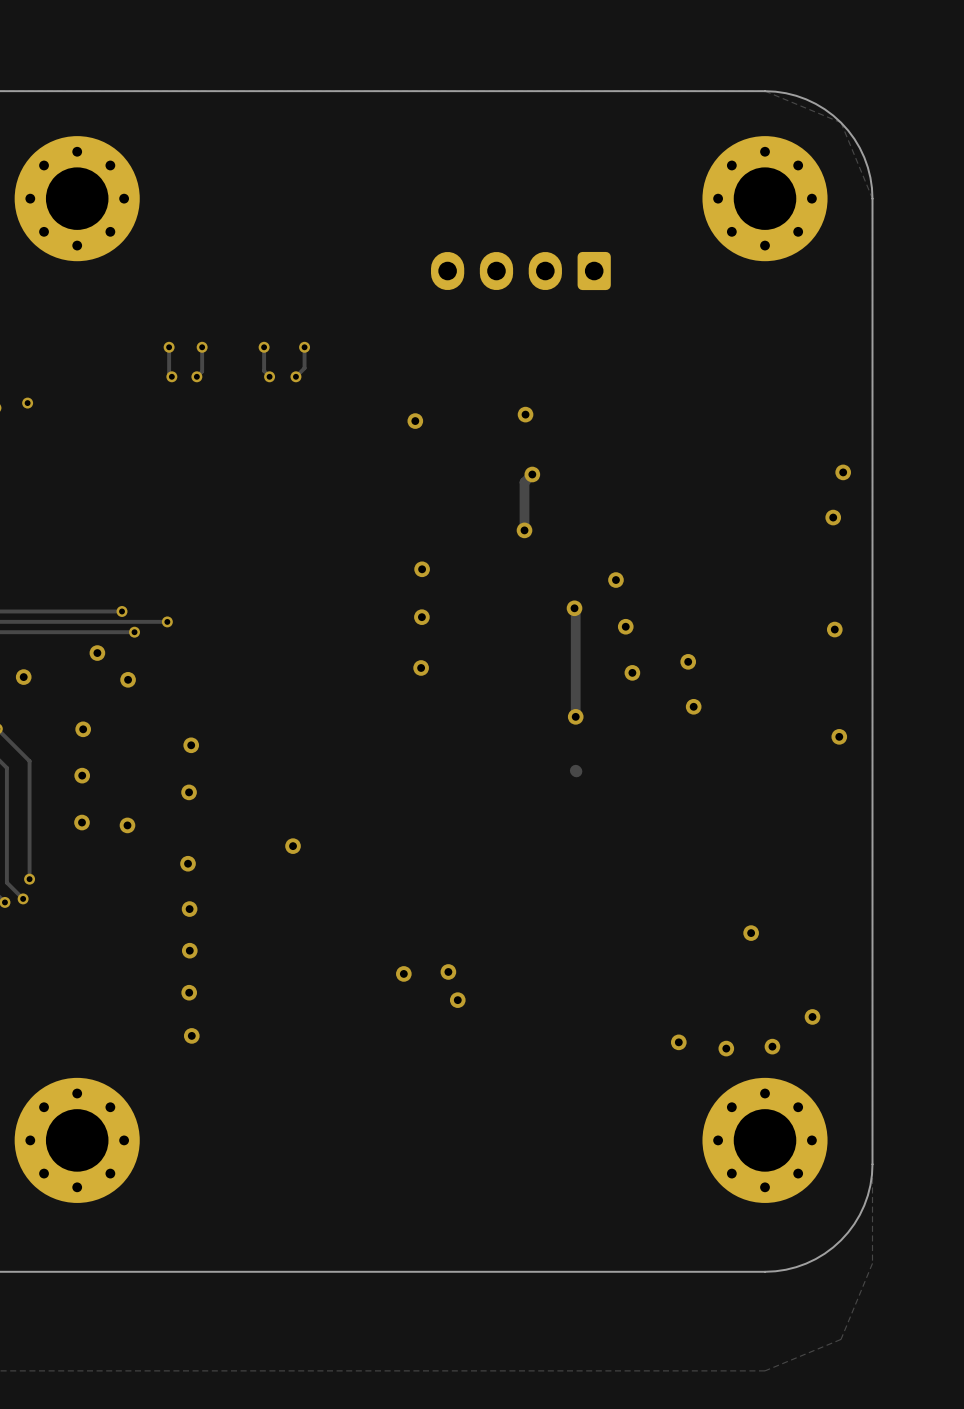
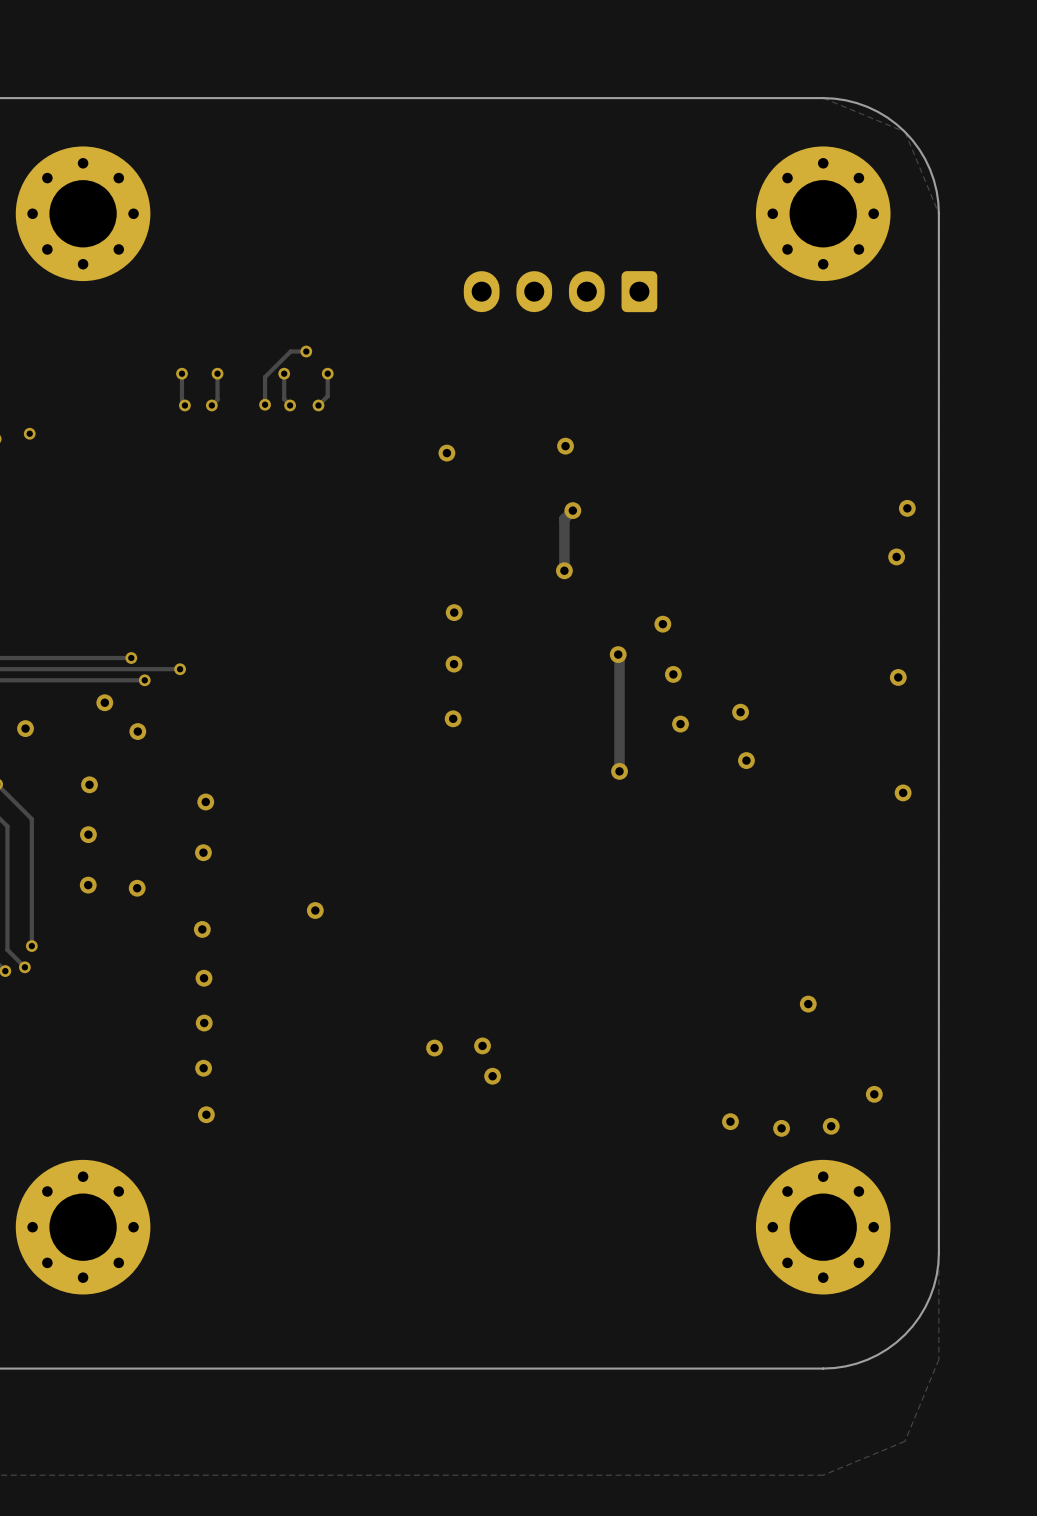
track: none -> (306, 351) (290, 351) (265, 377) (265, 404)
via: none -> (306, 351)
via: none -> (265, 404)
track: (575, 770) (576, 771) -> none

